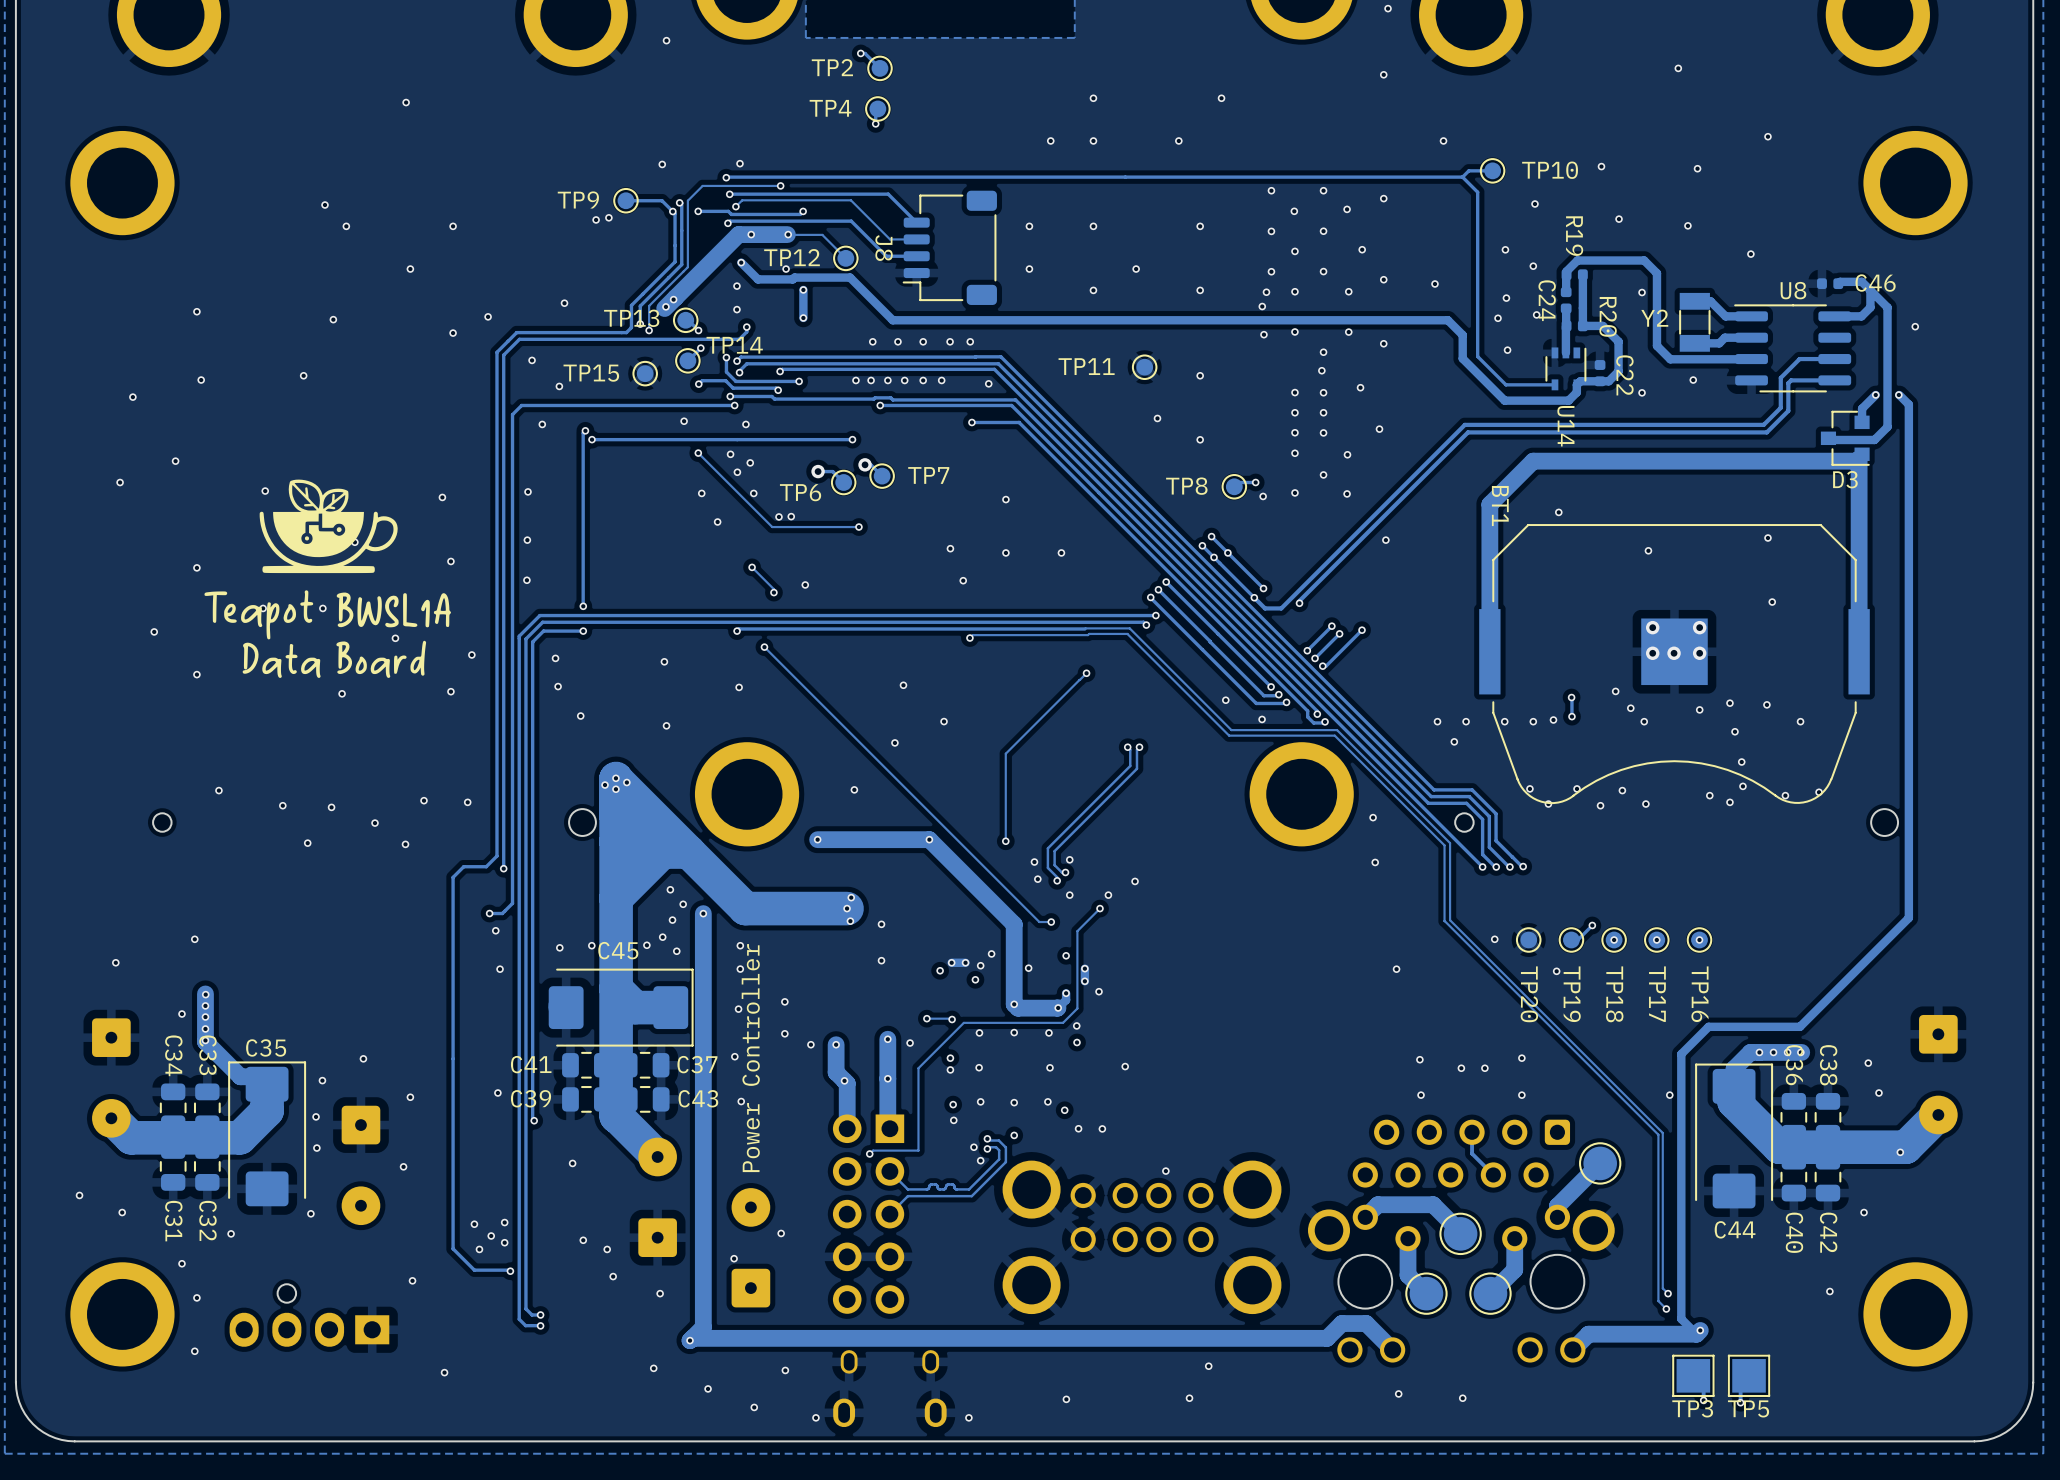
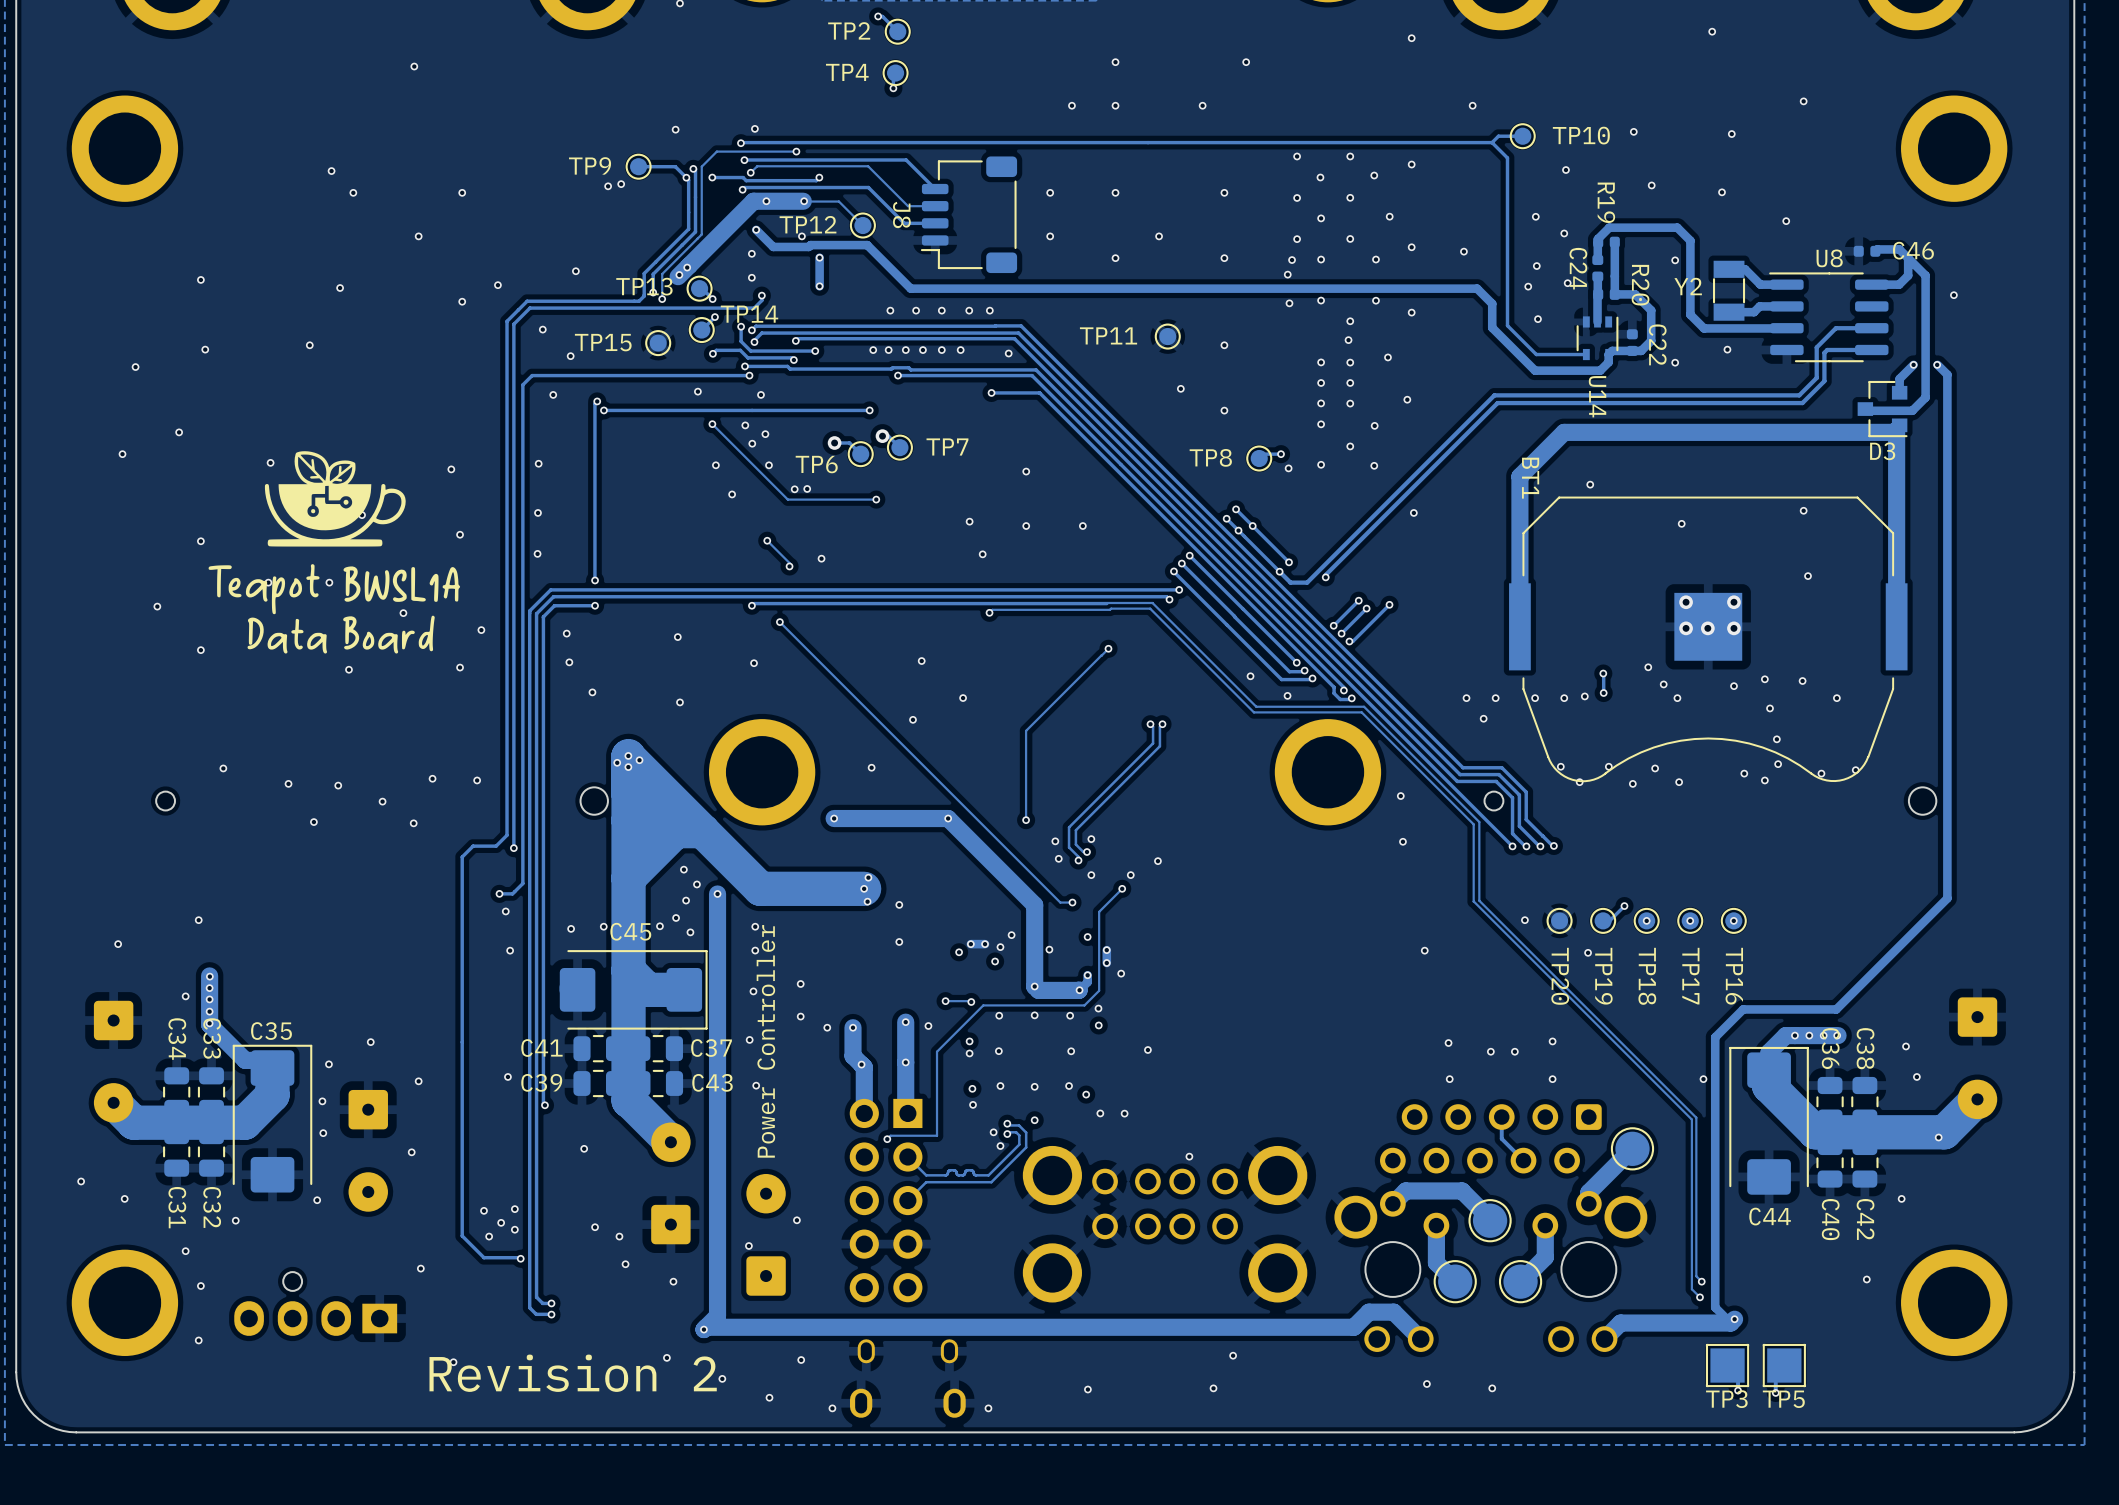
text: none -> Revision 2 (573, 1373)

